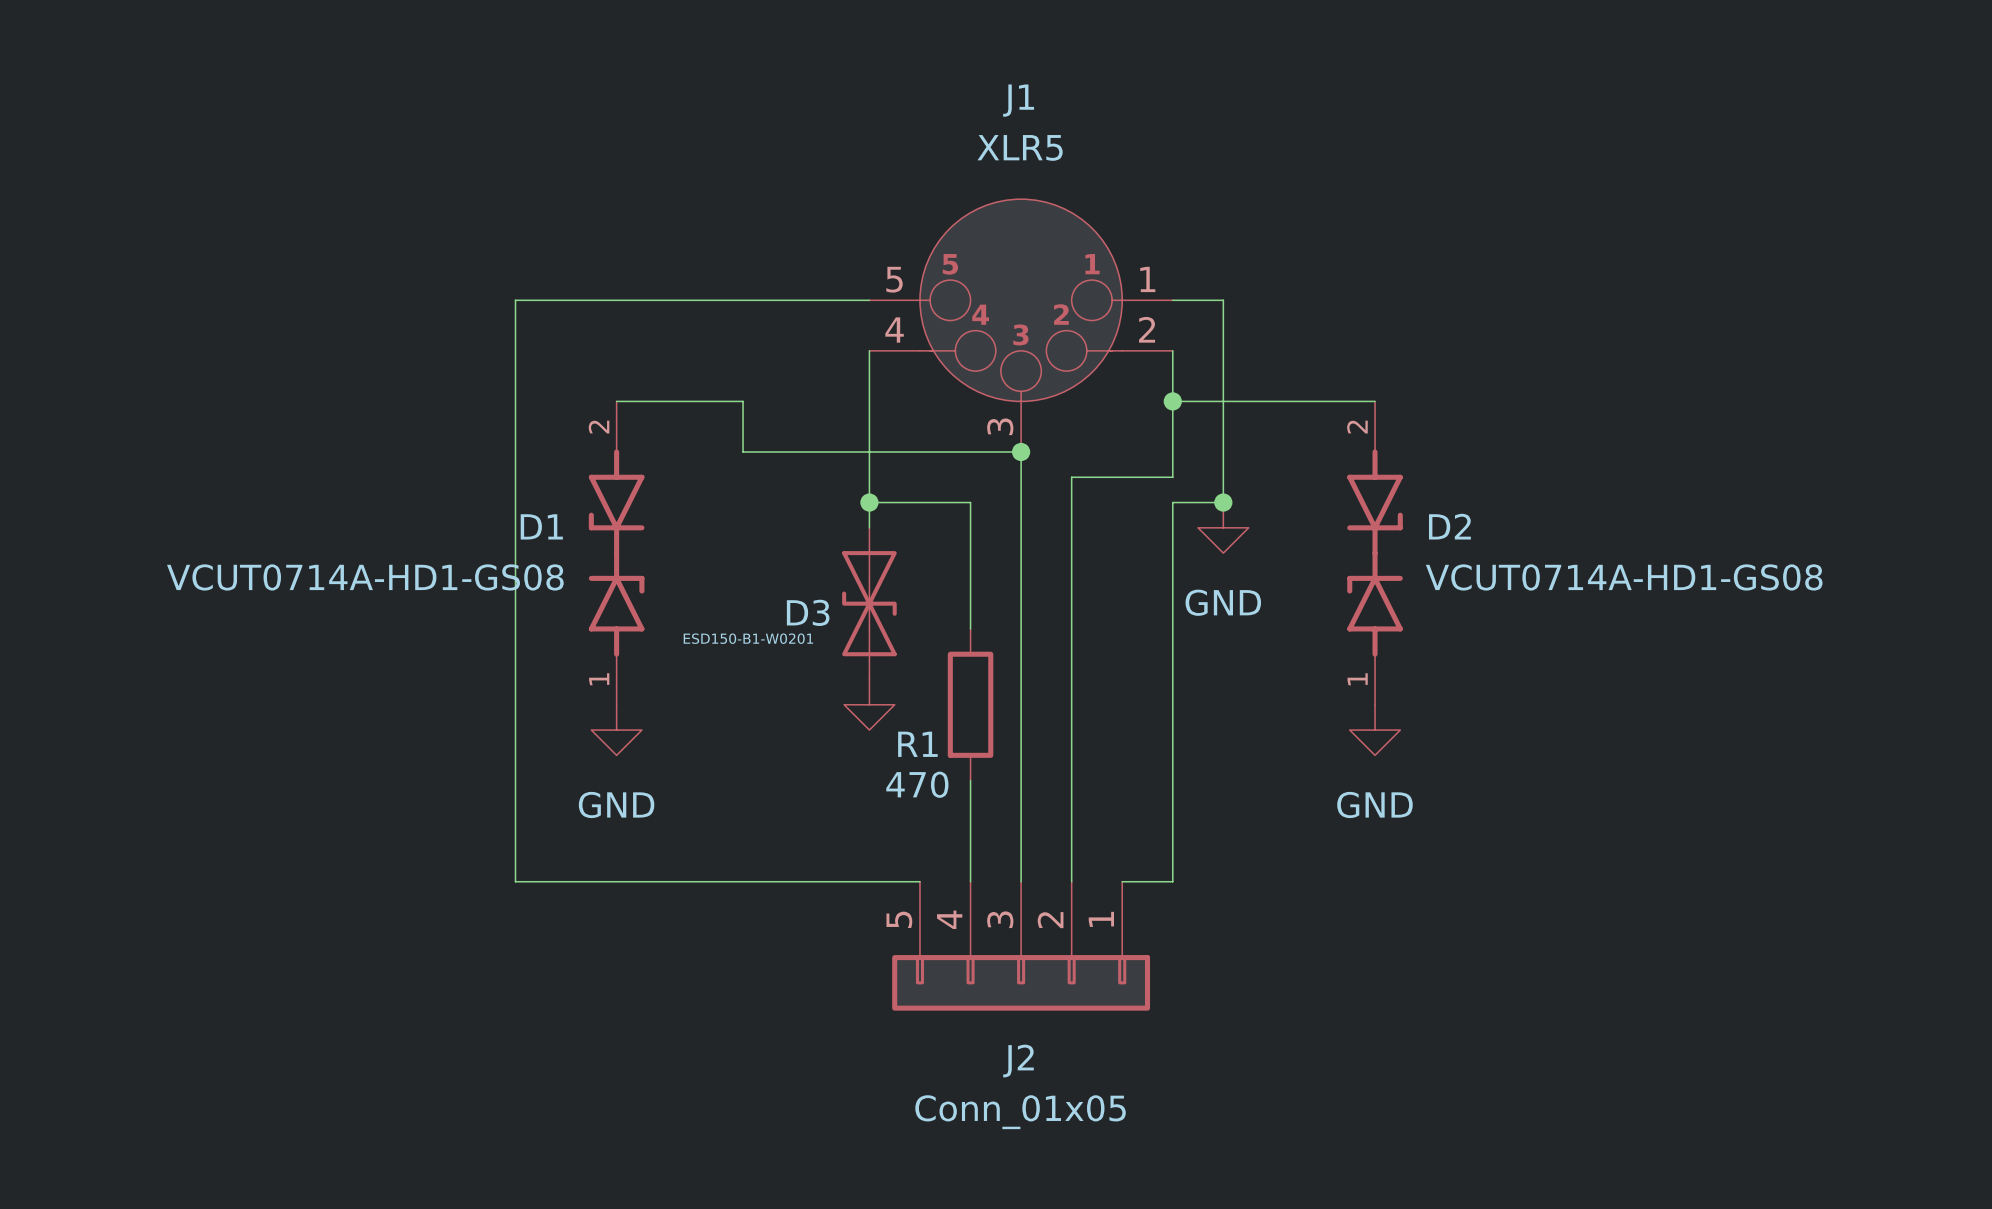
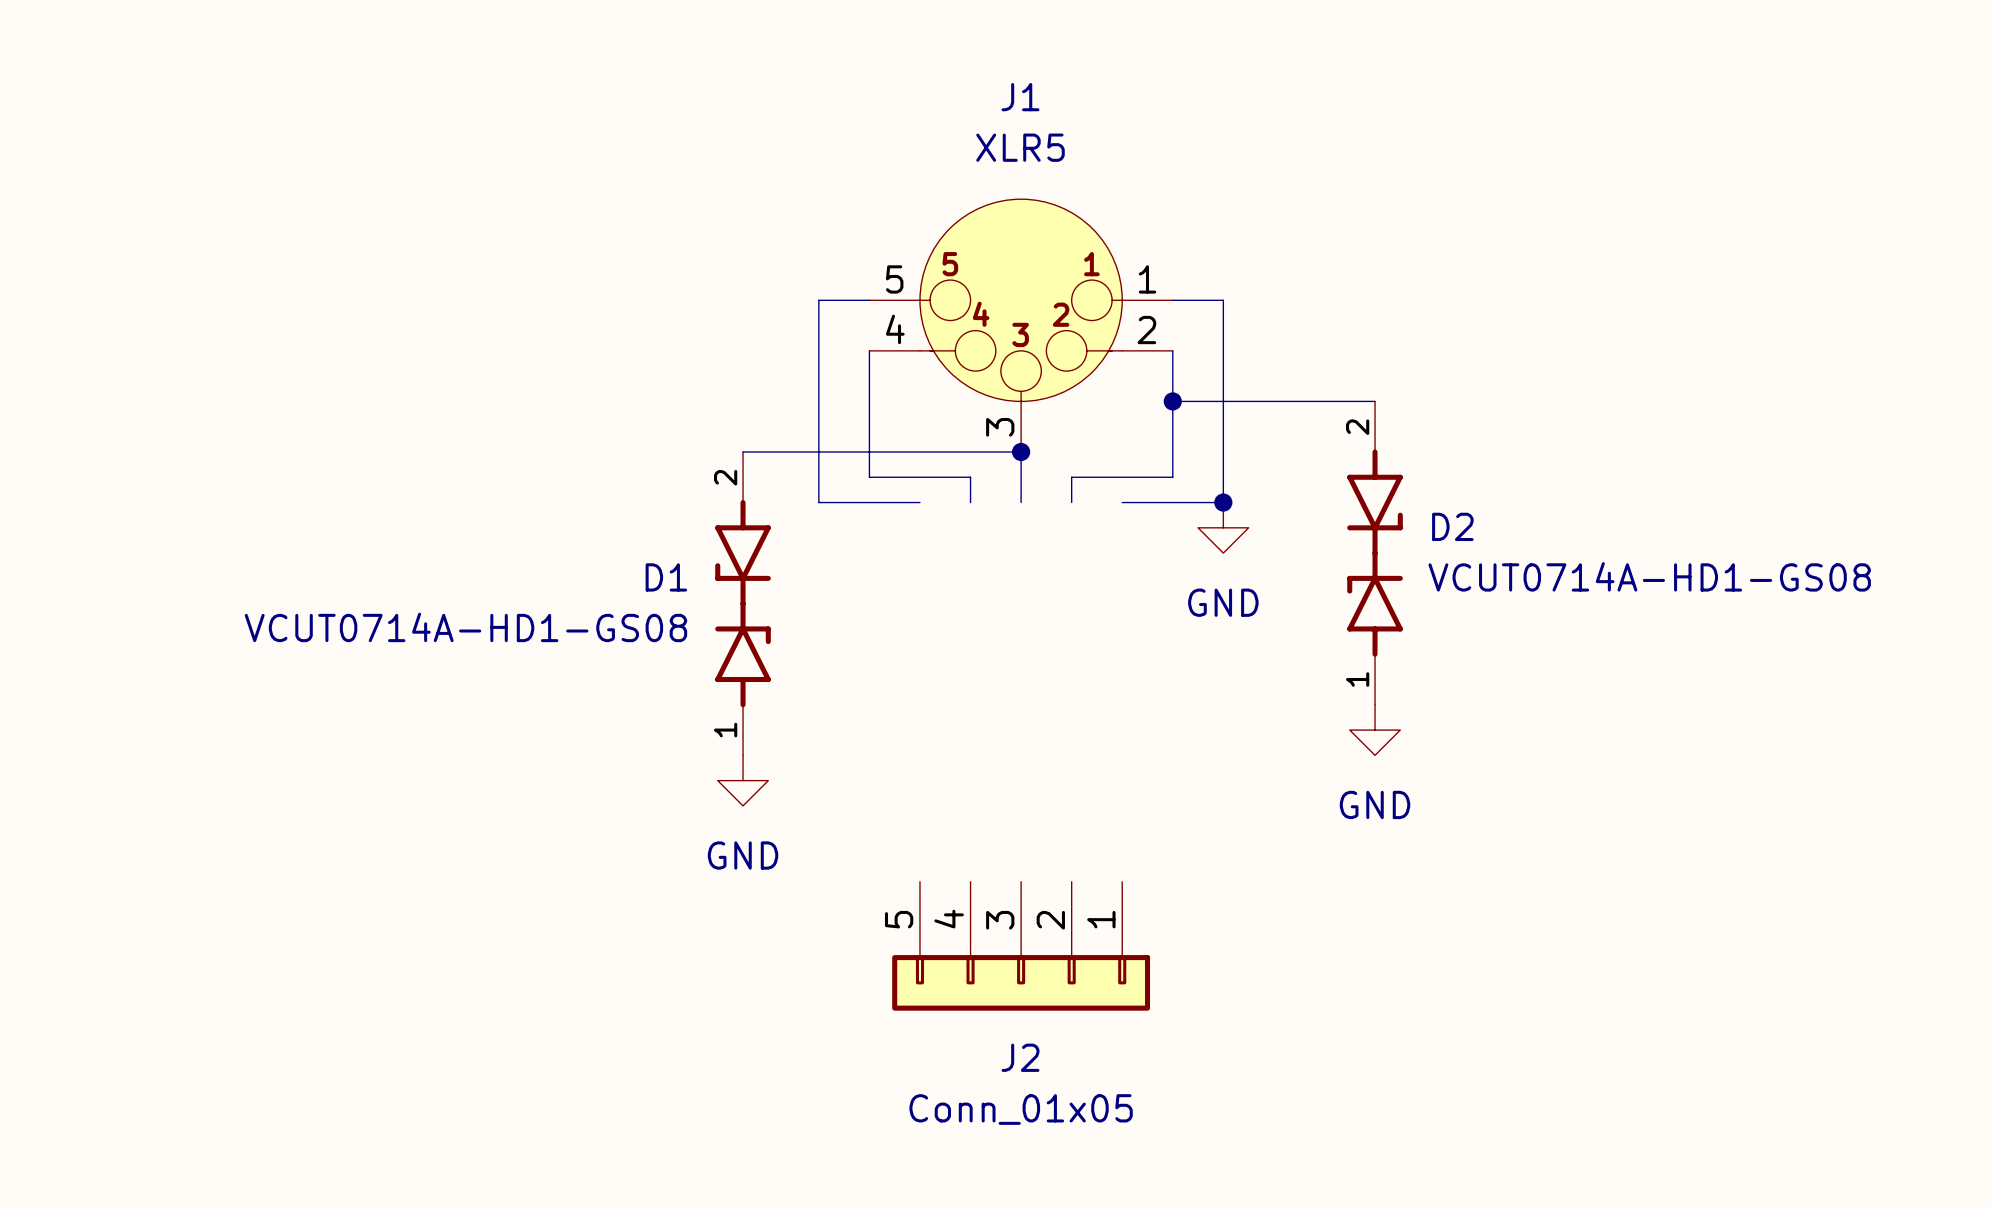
wire: (818, 300) (515, 300) (515, 881) (919, 881) -> (818, 300) (818, 502) (869, 502)
wire: (616, 401) (743, 401) (743, 451) -> none
wire: (869, 477) (869, 527) -> (869, 477) (970, 477) (970, 502)
junction: (869, 502) -> none
wire: (919, 502) (970, 502) (970, 628) -> none
wire: (1021, 502) (1021, 881) -> none
wire: (1071, 502) (1071, 881) -> none
wire: (1172, 502) (1172, 881) (1122, 881) -> (1172, 502) (1122, 502)
D1 position: (616, 553) -> (743, 603)
D3: ESD150-B1-W0201 (869, 603) -> none
power symbol: (869, 704) -> none
R1: 470 (970, 704) -> none
power symbol position: GND (616, 730) -> GND (743, 780)
wire: (970, 780) (970, 881) -> none

